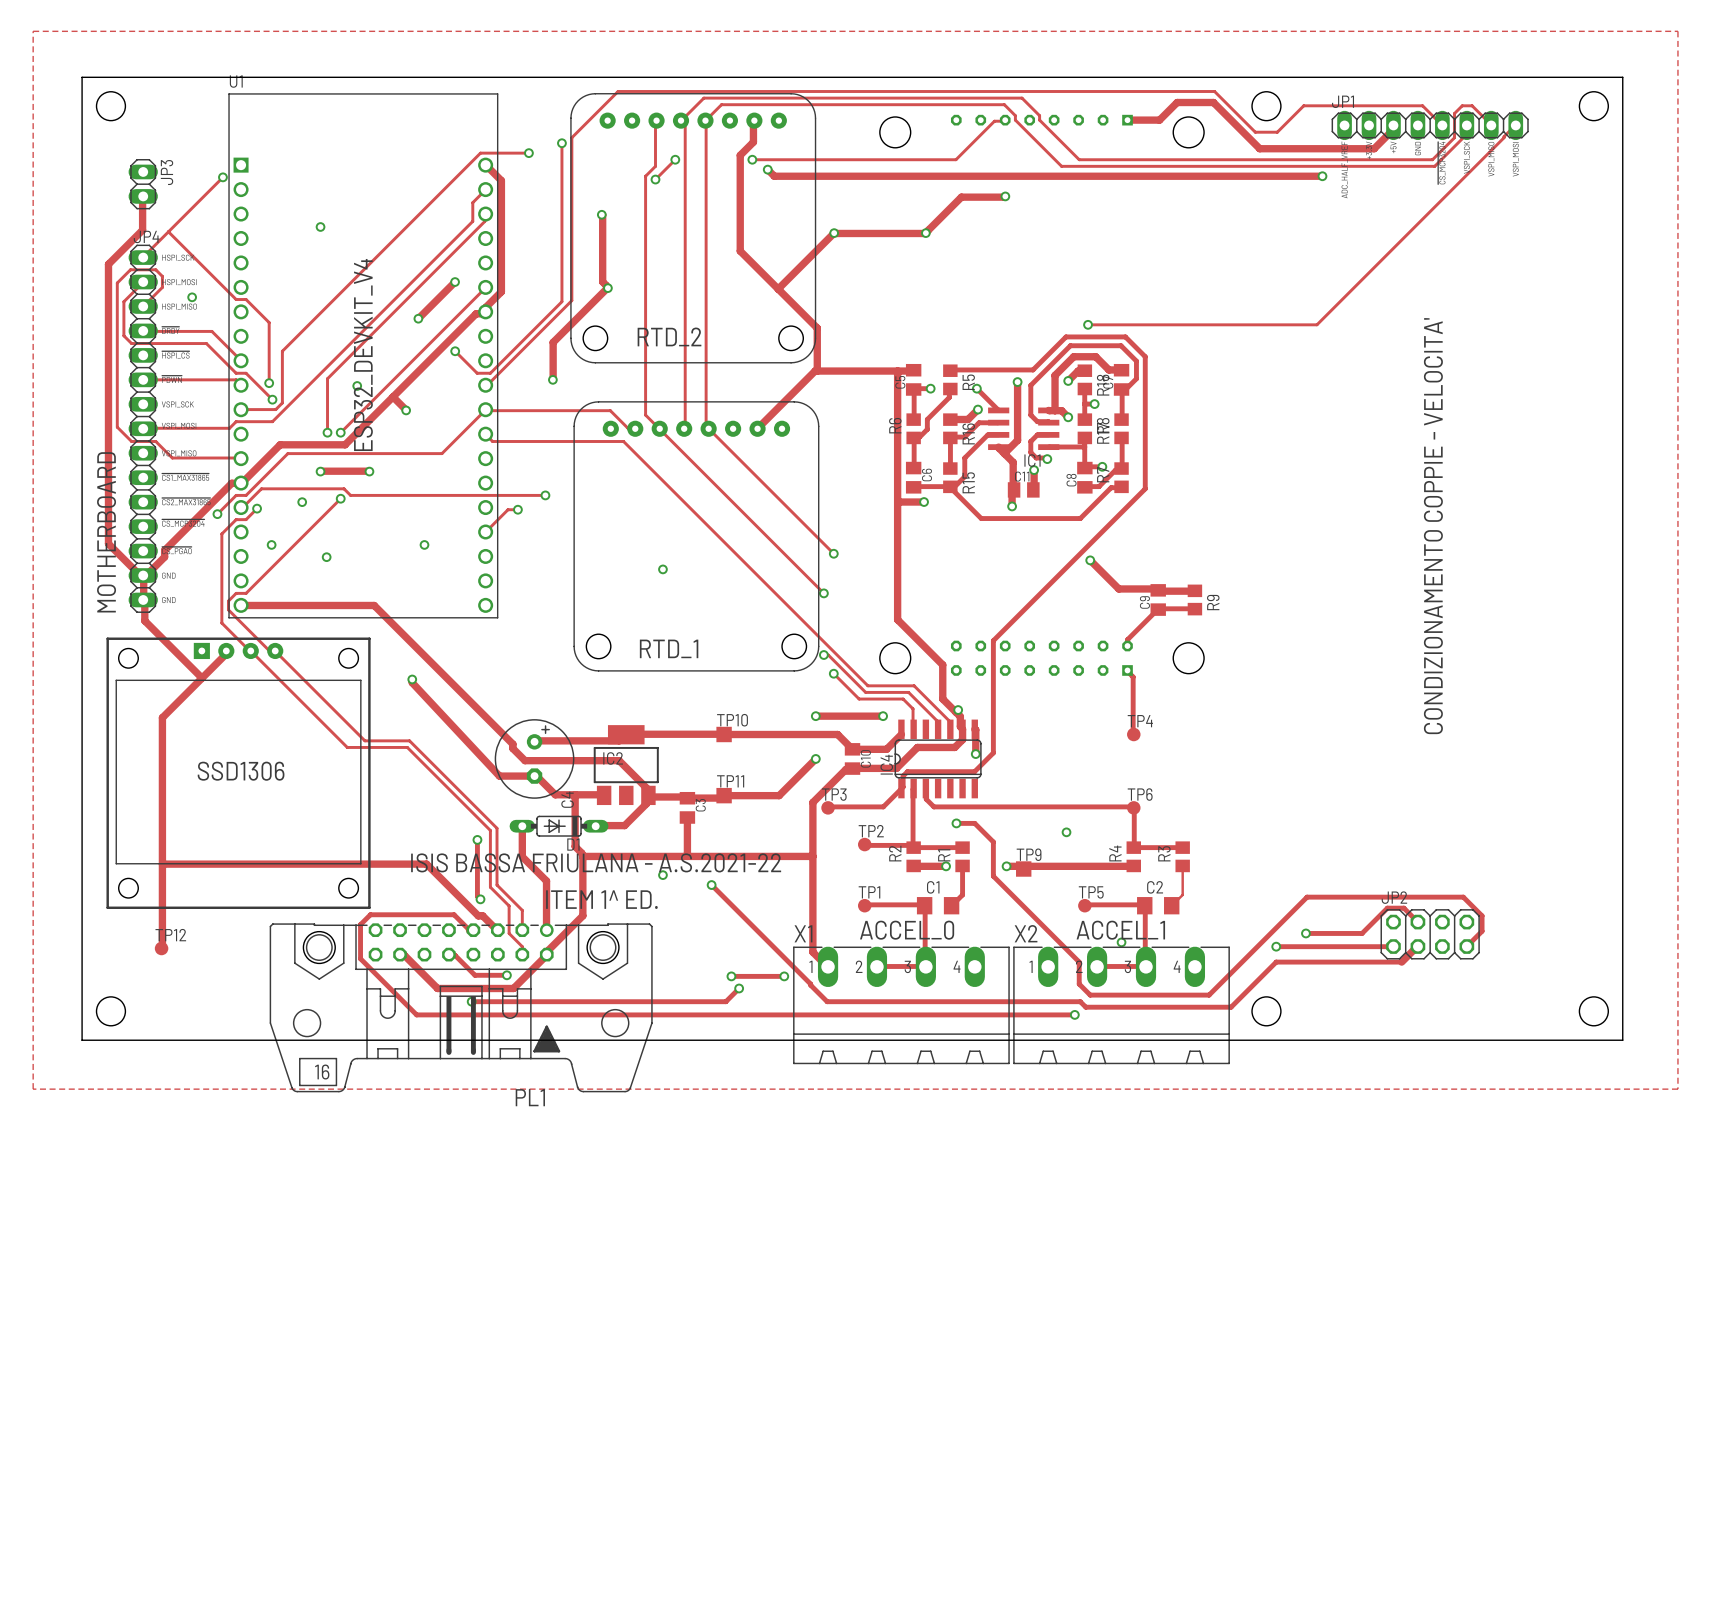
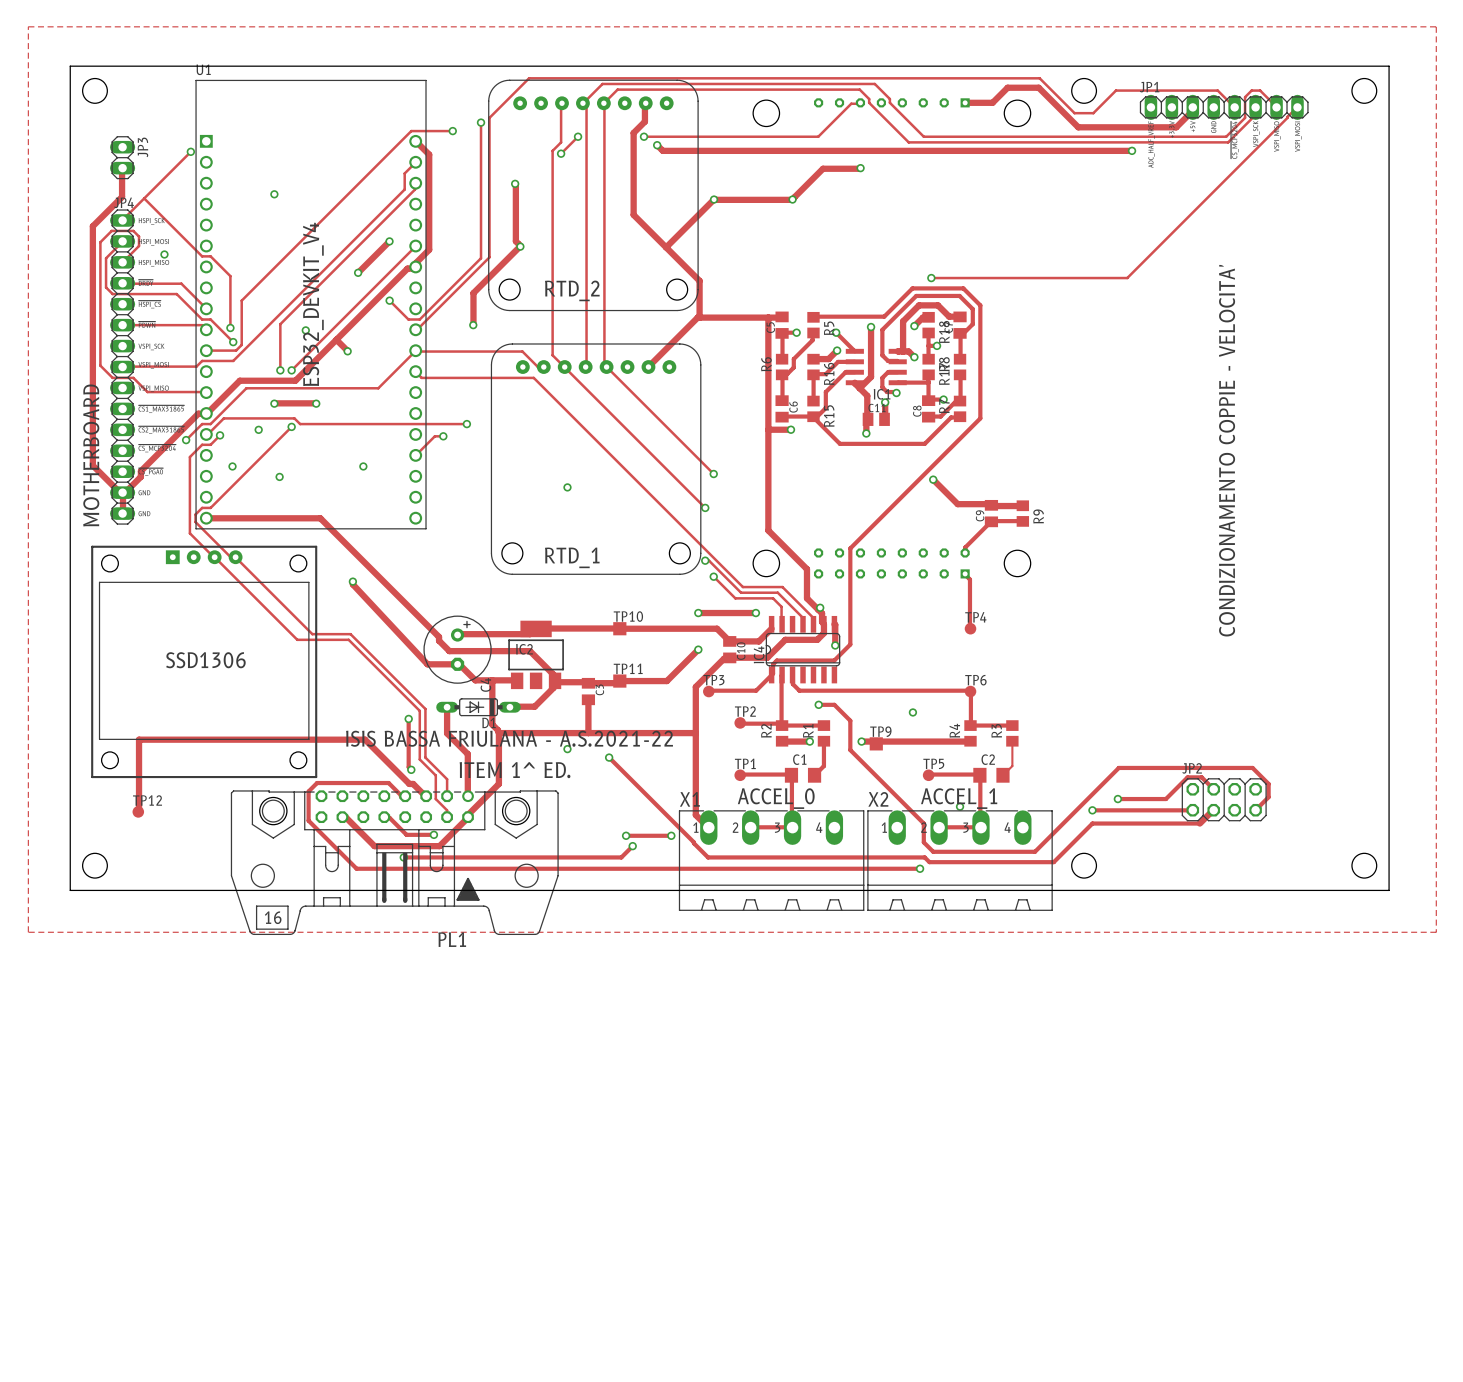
track: (144, 603) (144, 620) (202, 678) -> none
track: (226, 650) (226, 653) (162, 717) (162, 864) -> none

